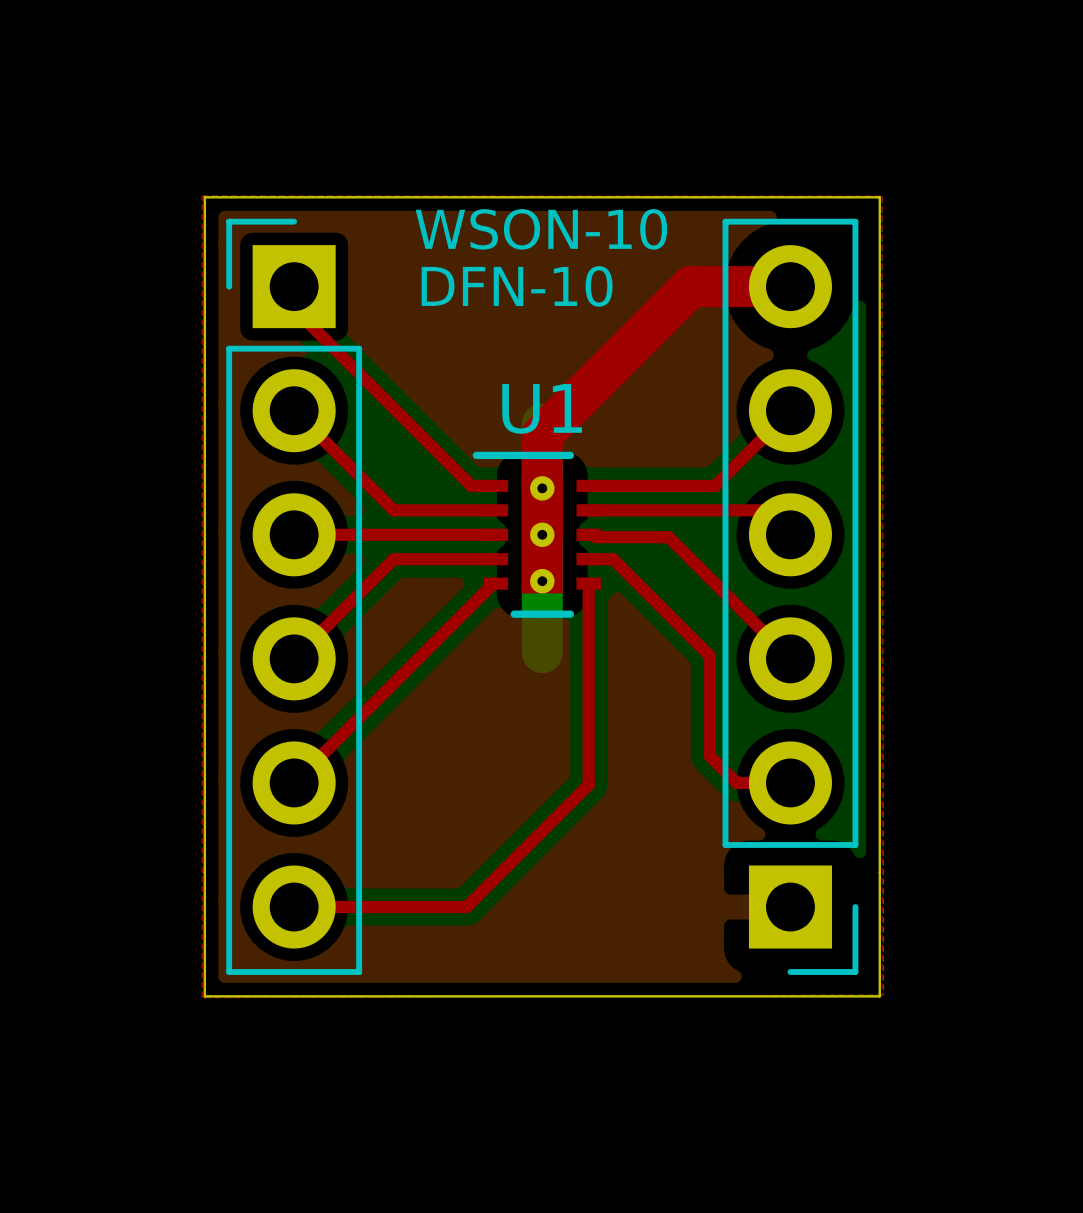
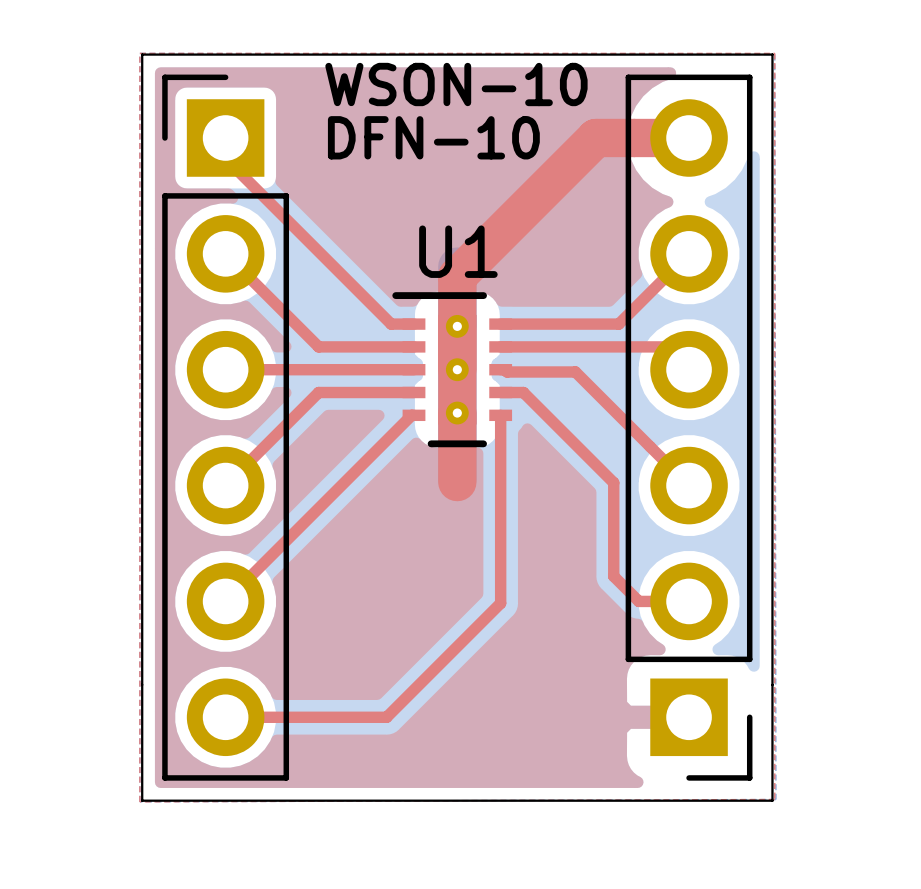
top track: none -> (457, 413) (457, 482)

